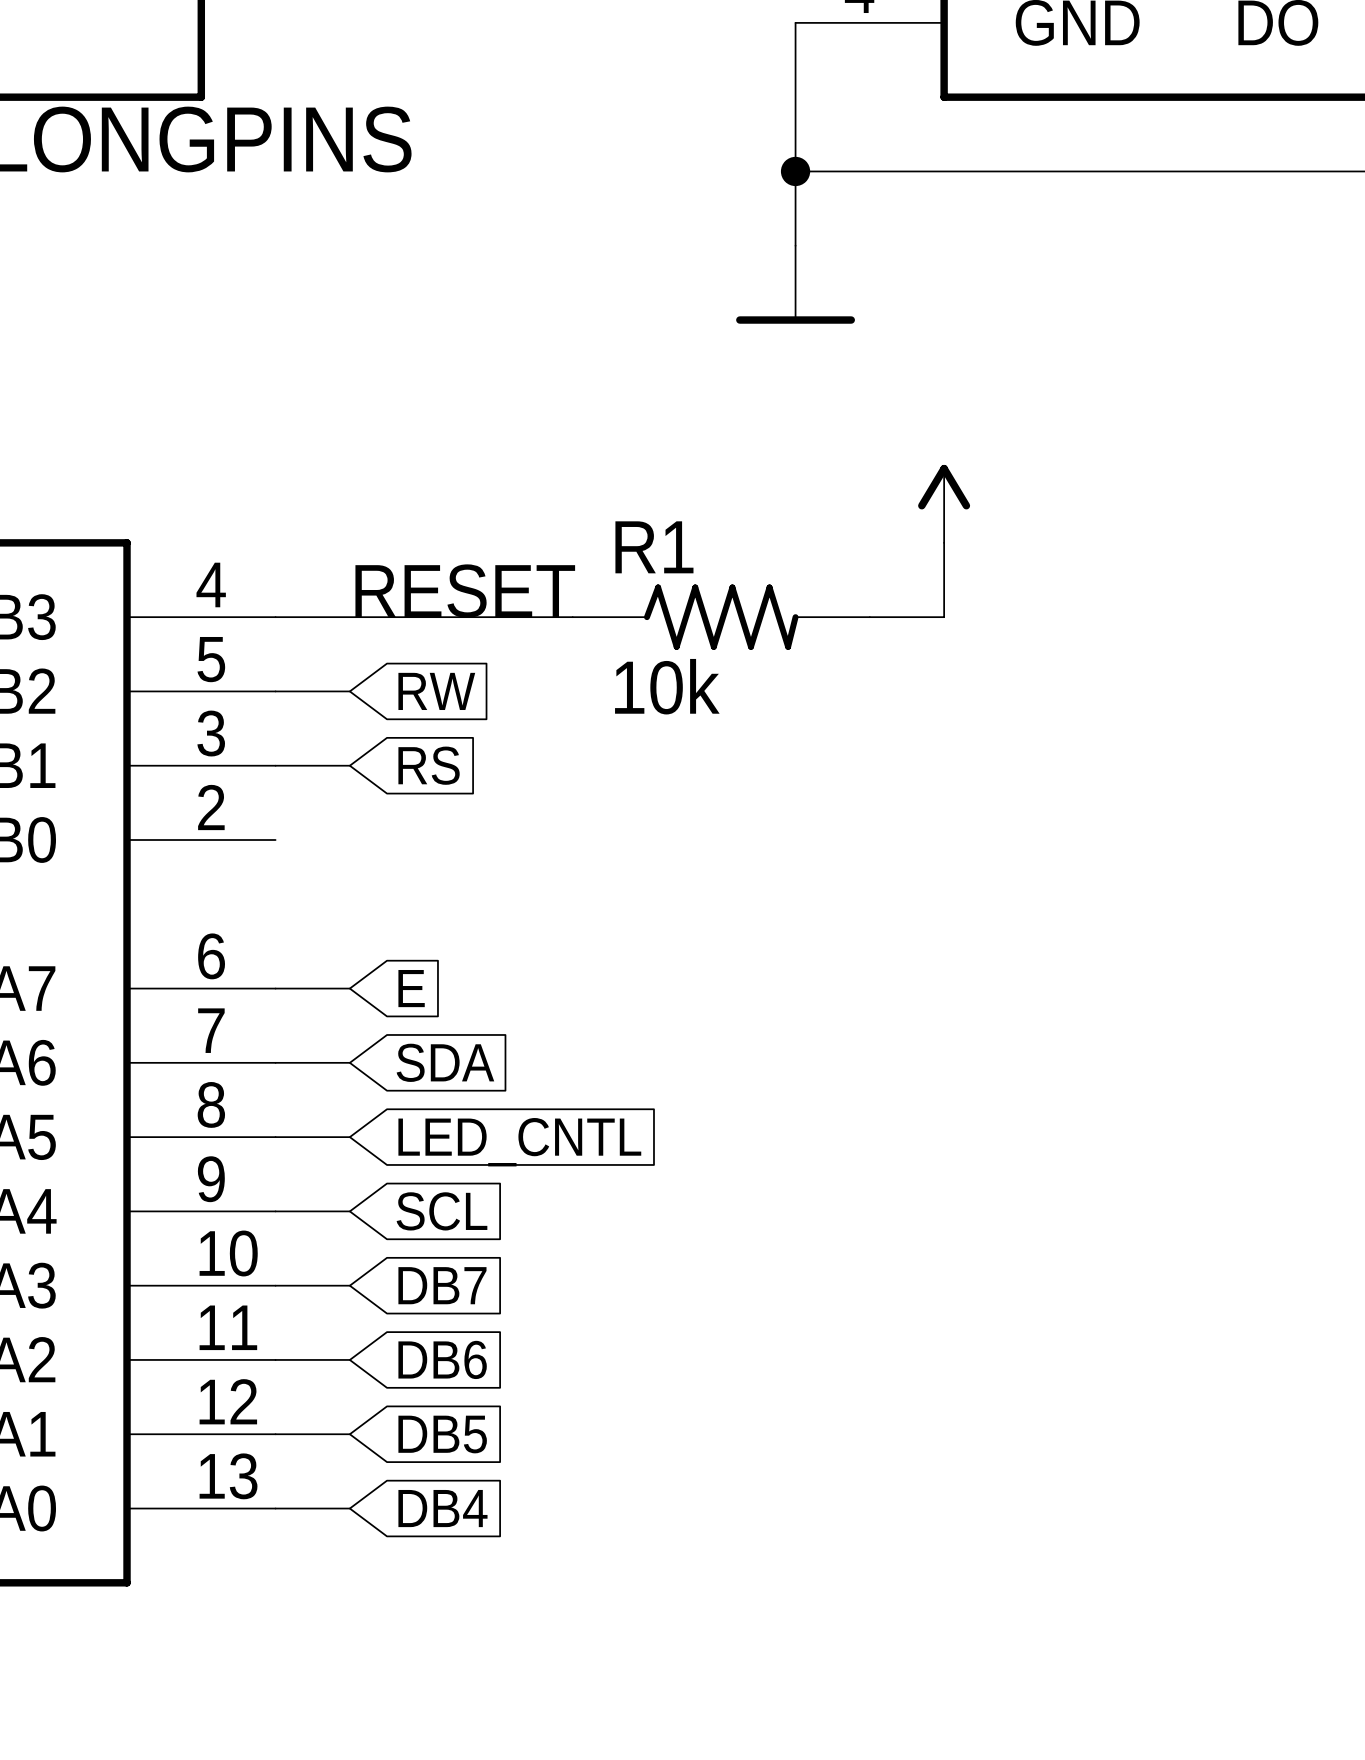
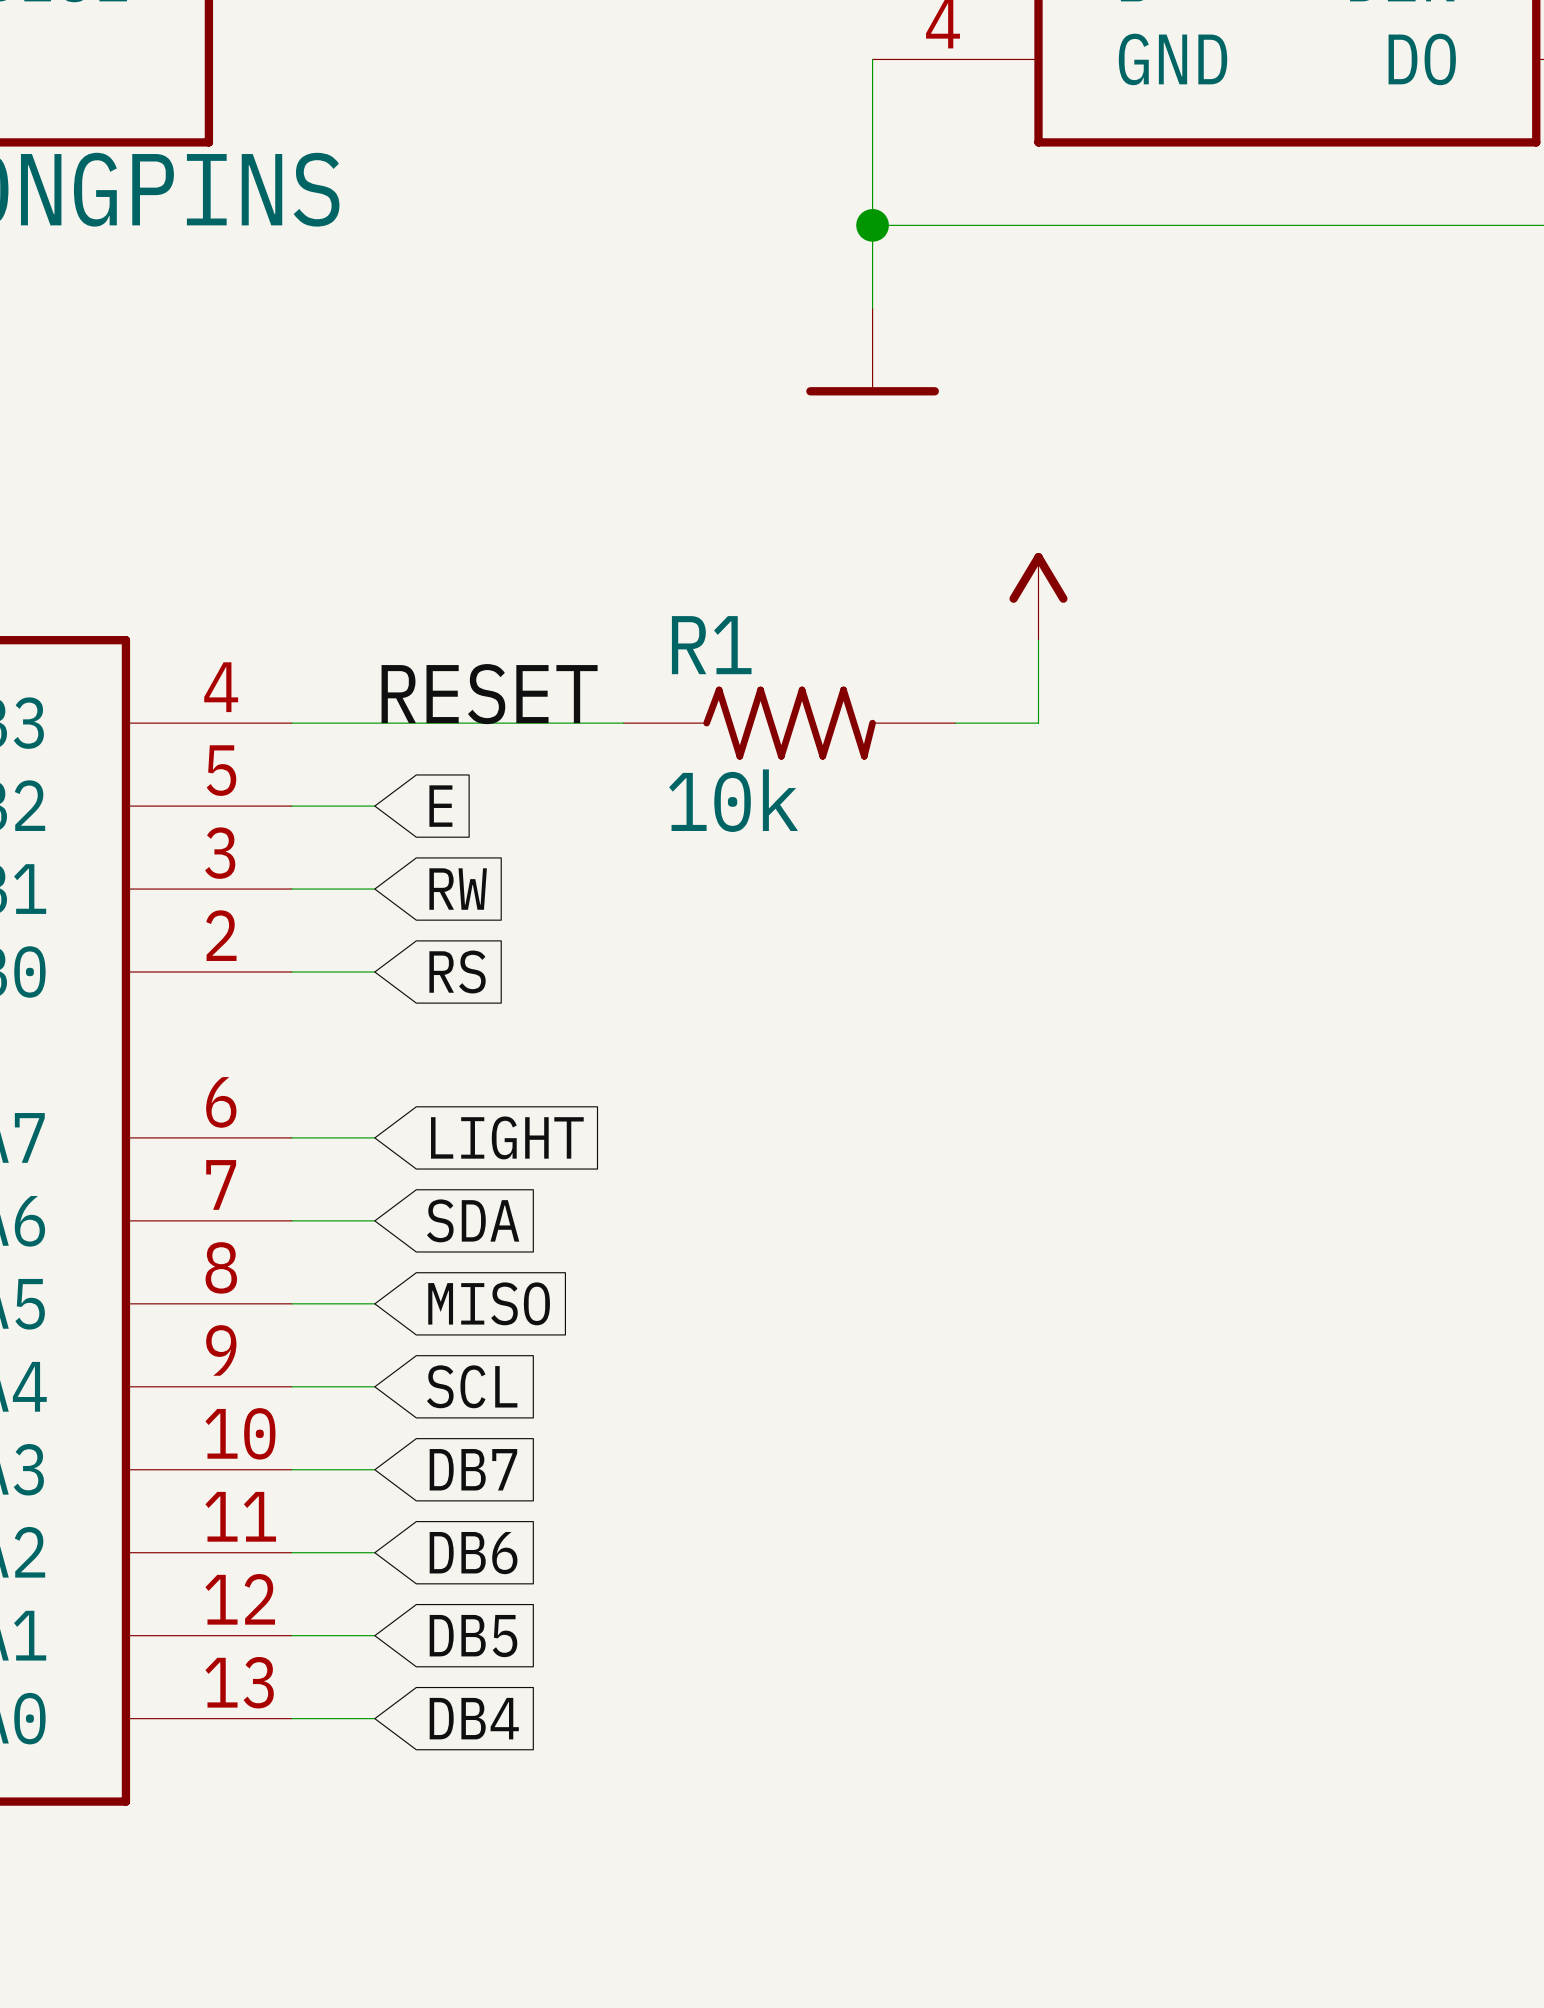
global label: RW (436, 691) -> E (440, 806)
global label: RS (429, 765) -> RW (458, 889)
global label: none -> RS (457, 972)
wire: none -> (291, 972) (374, 972)
global label: E (411, 988) -> LIGHT (507, 1137)
global label: LED_CNTL (519, 1142) -> MISO (489, 1303)

